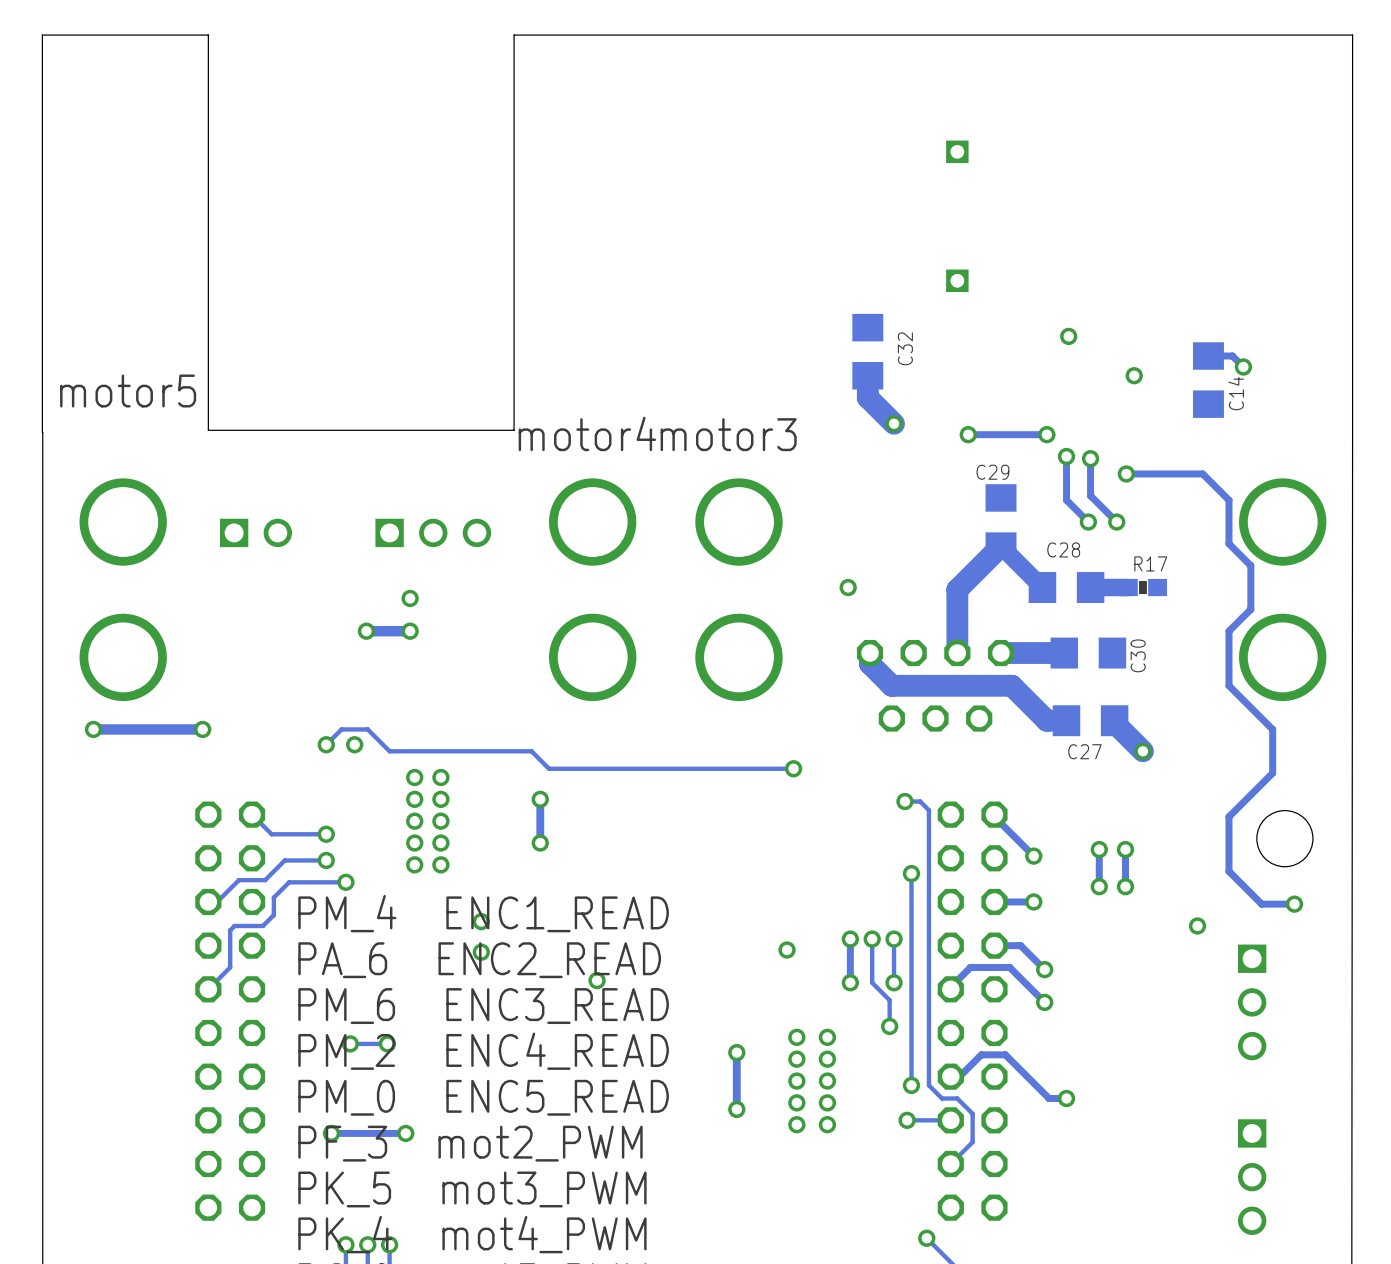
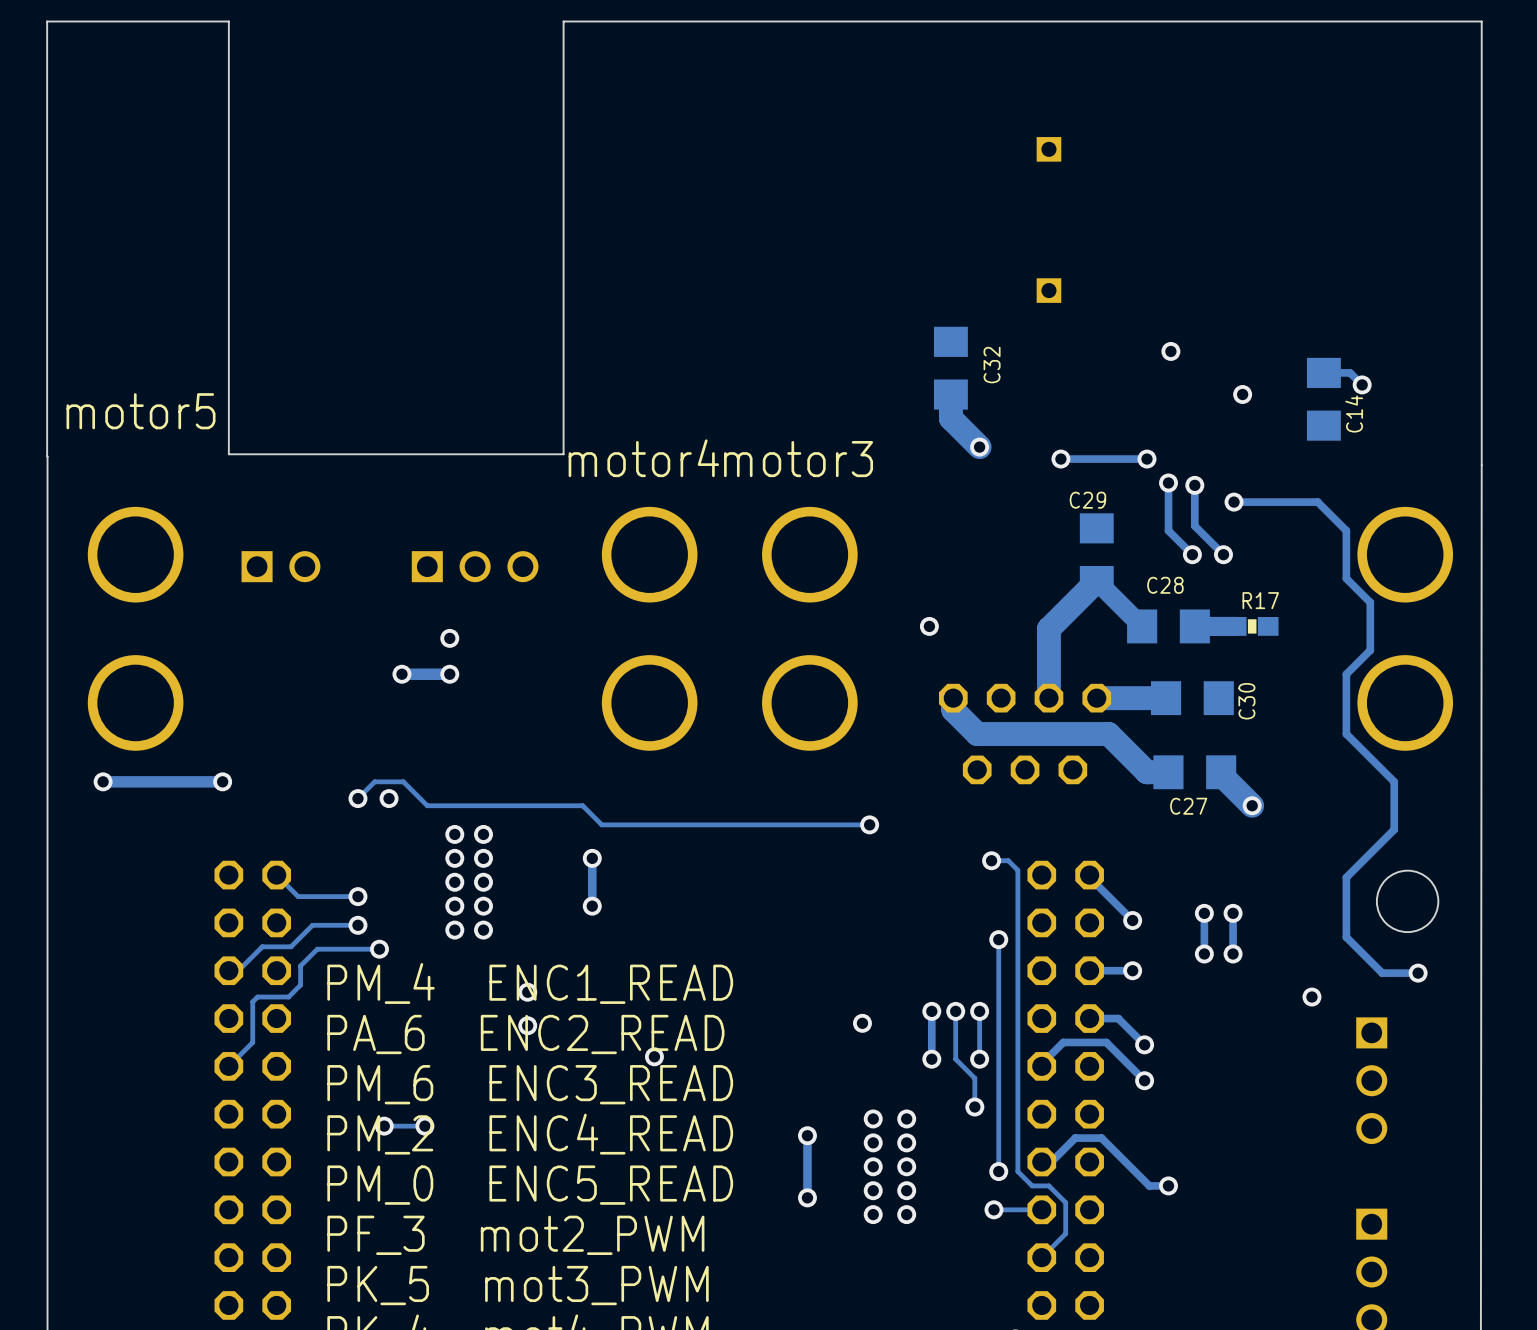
via: (331, 1133) -> none
track: (405, 1133) (331, 1133) -> none
via: (405, 1133) -> none

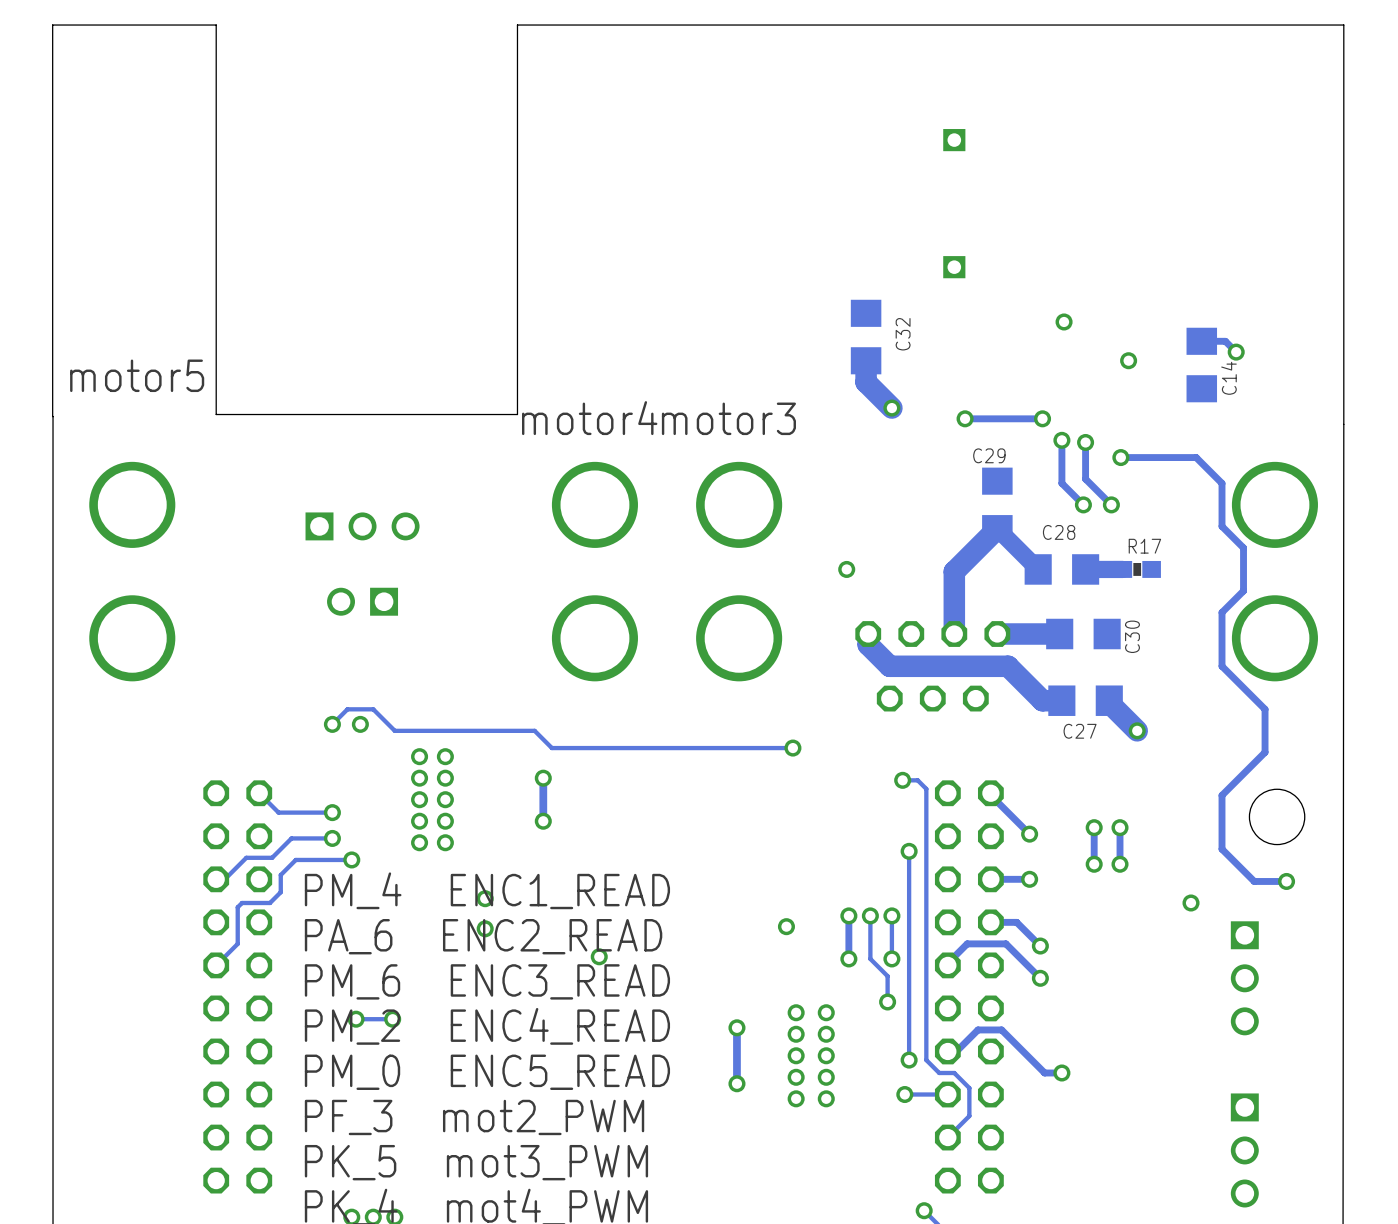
part rotation: 0° (280, 566) -> 180° (362, 601)
part position: (280, 566) -> (362, 601)
part position: (475, 566) -> (362, 526)
via: (449, 638) -> none
via: (401, 674) -> none
track: (449, 674) (401, 674) -> none
via: (449, 674) -> none
via: (103, 781) -> none
track: (222, 781) (103, 781) -> none
via: (222, 781) -> none

